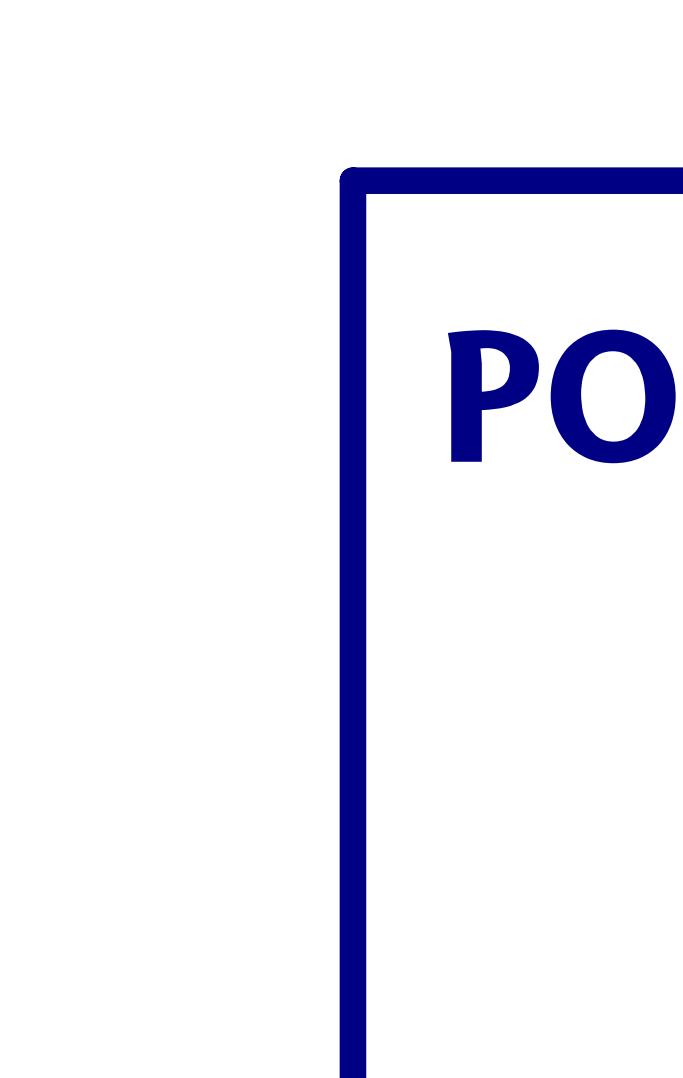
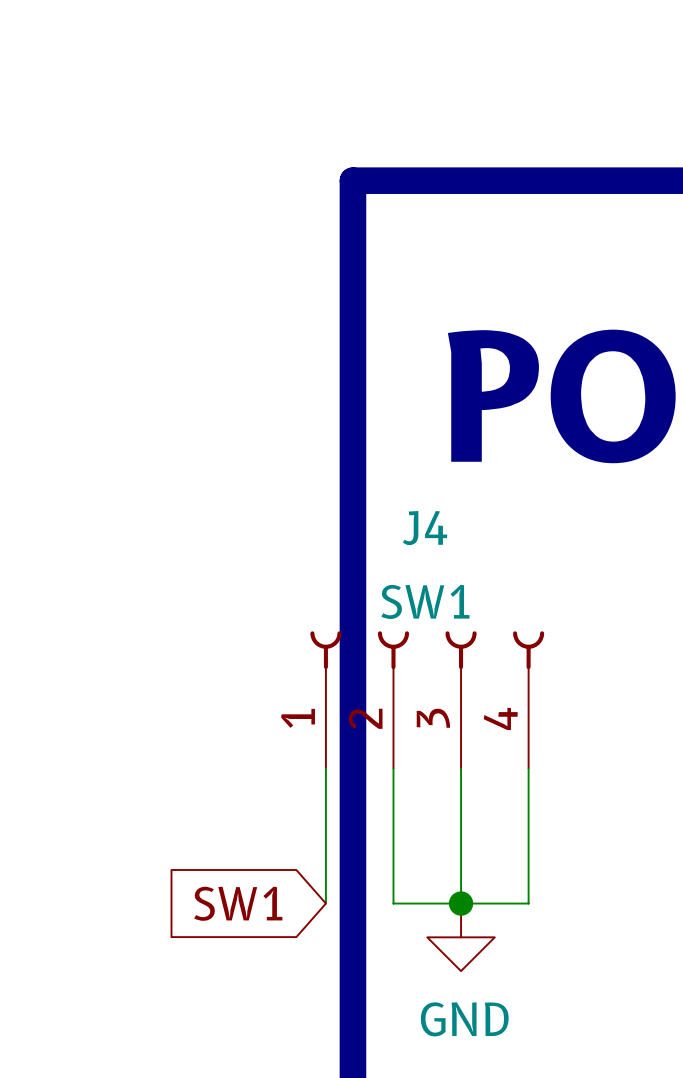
J4: none -> SW1 (427, 699)
wire: none -> (325, 768) (325, 903)
wire: none -> (393, 768) (393, 903) (528, 903) (528, 768)
wire: none -> (461, 768) (461, 903)
global label: none -> SW1 (238, 903)
junction: none -> (461, 903)
power symbol: none -> GND (461, 937)

